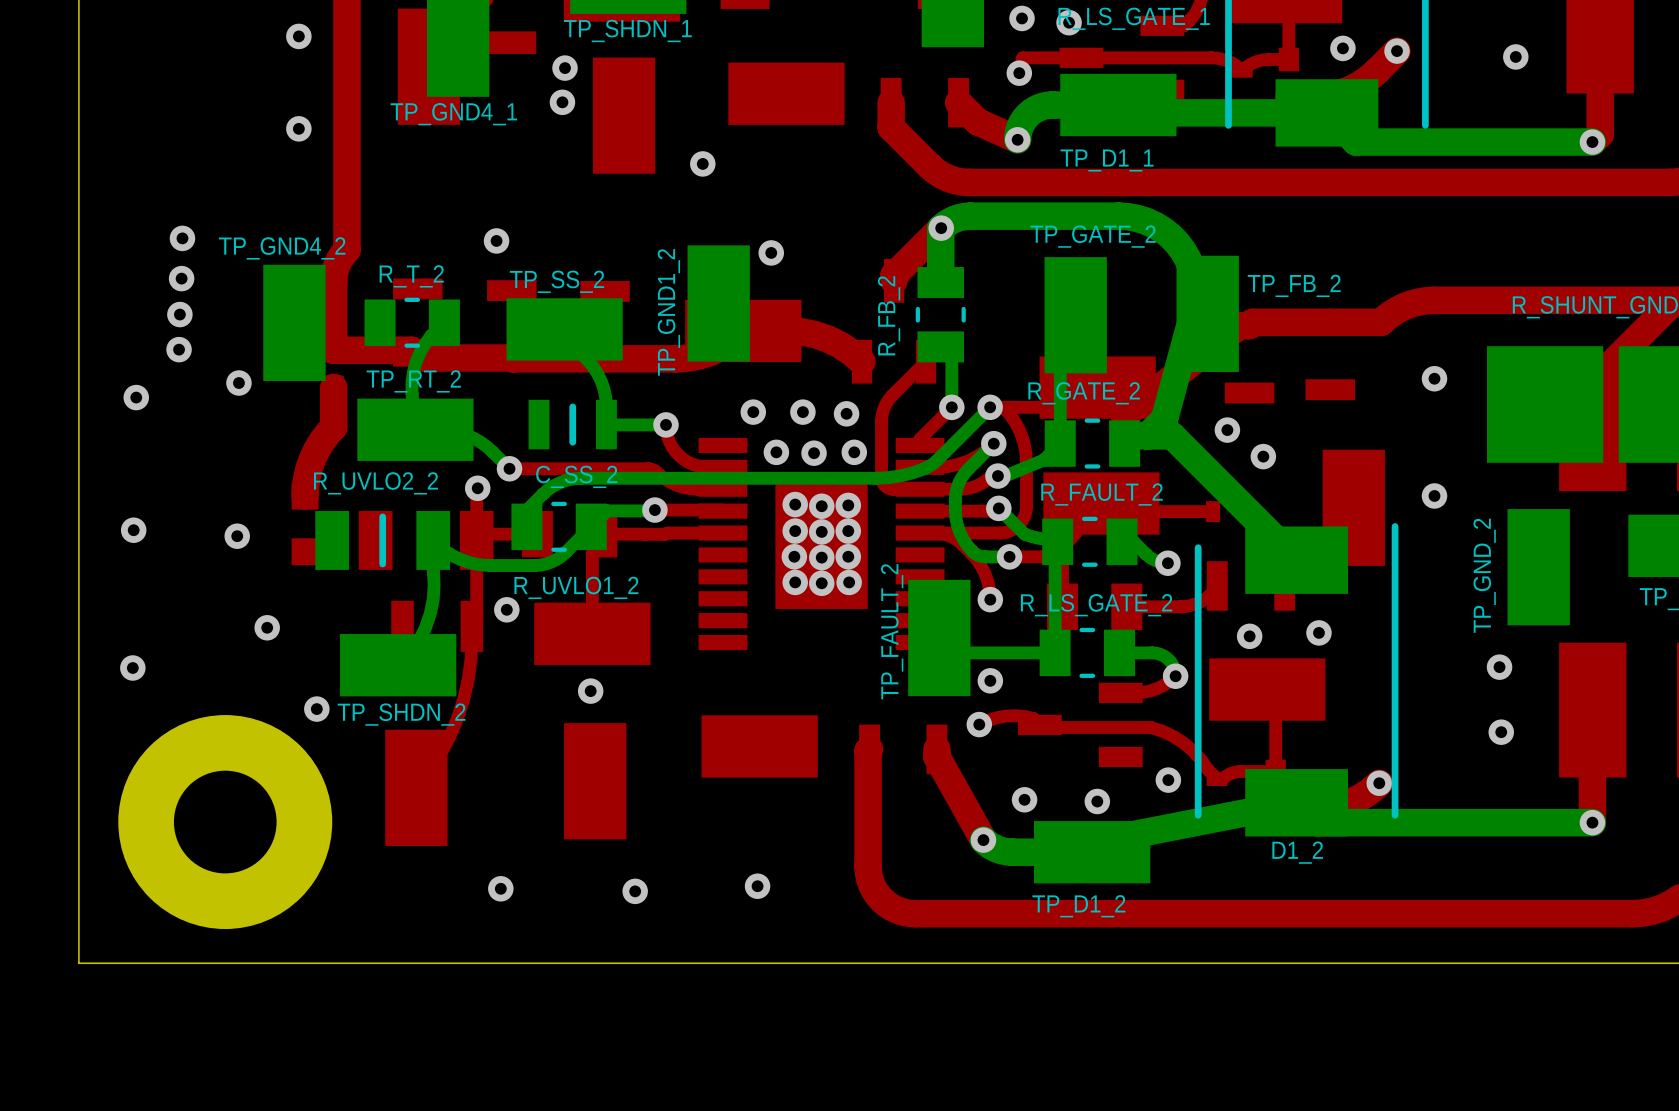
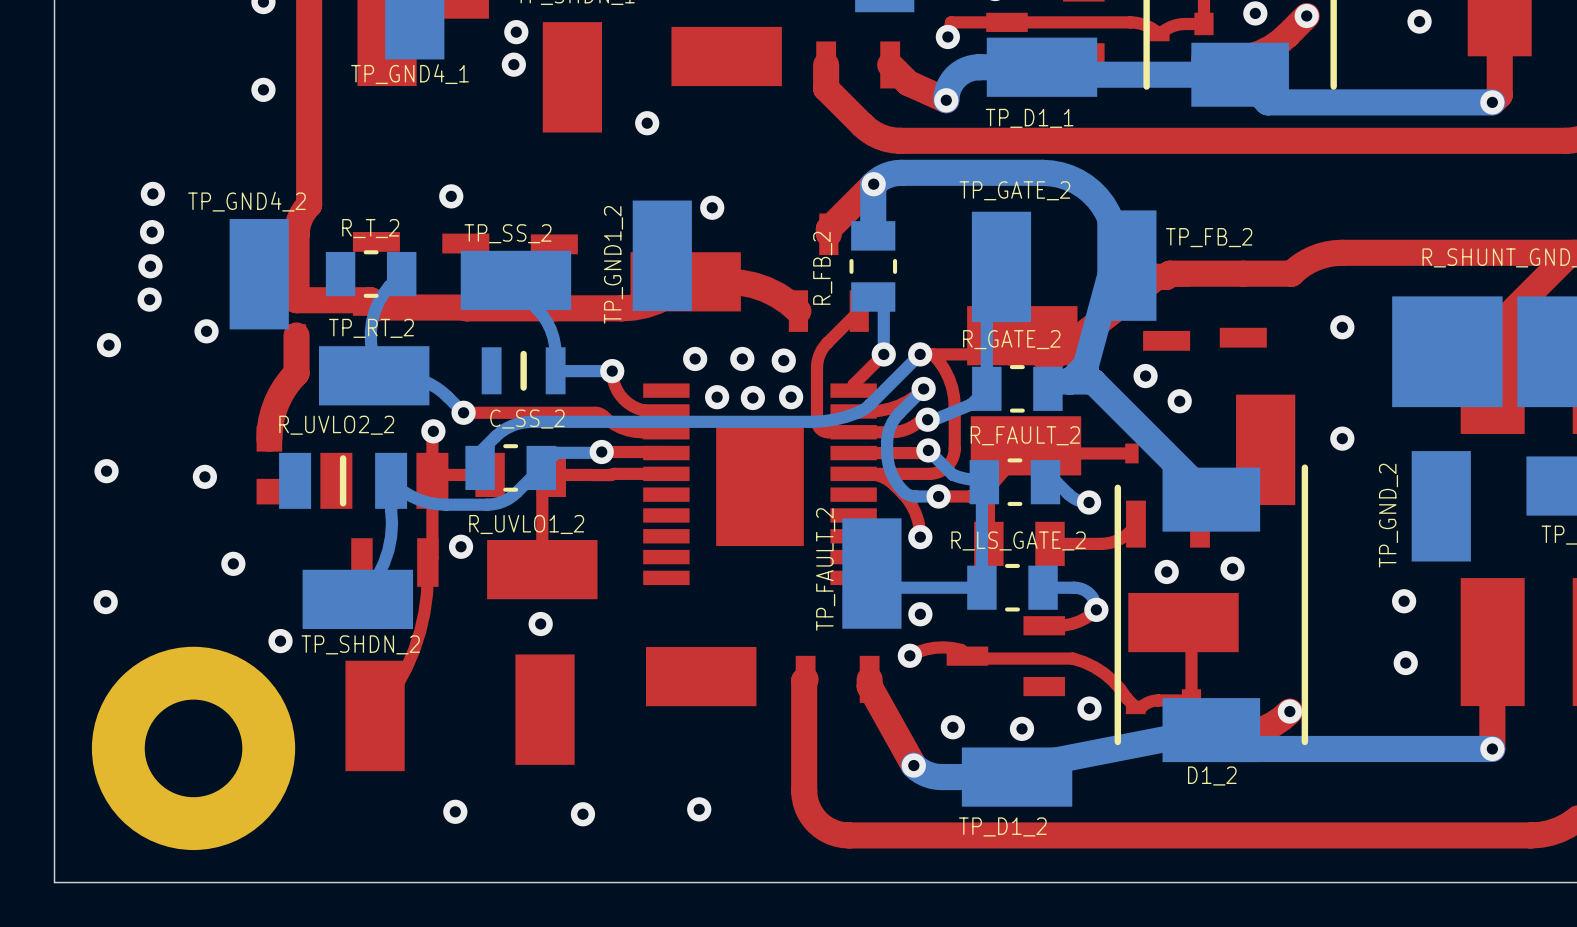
via: (795, 504) -> none
via: (848, 505) -> none
via: (821, 506) -> none
via: (795, 531) -> none
via: (821, 531) -> none
via: (848, 531) -> none
via: (794, 556) -> none
via: (848, 556) -> none
via: (821, 557) -> none
via: (795, 582) -> none
via: (849, 582) -> none
via: (821, 583) -> none

